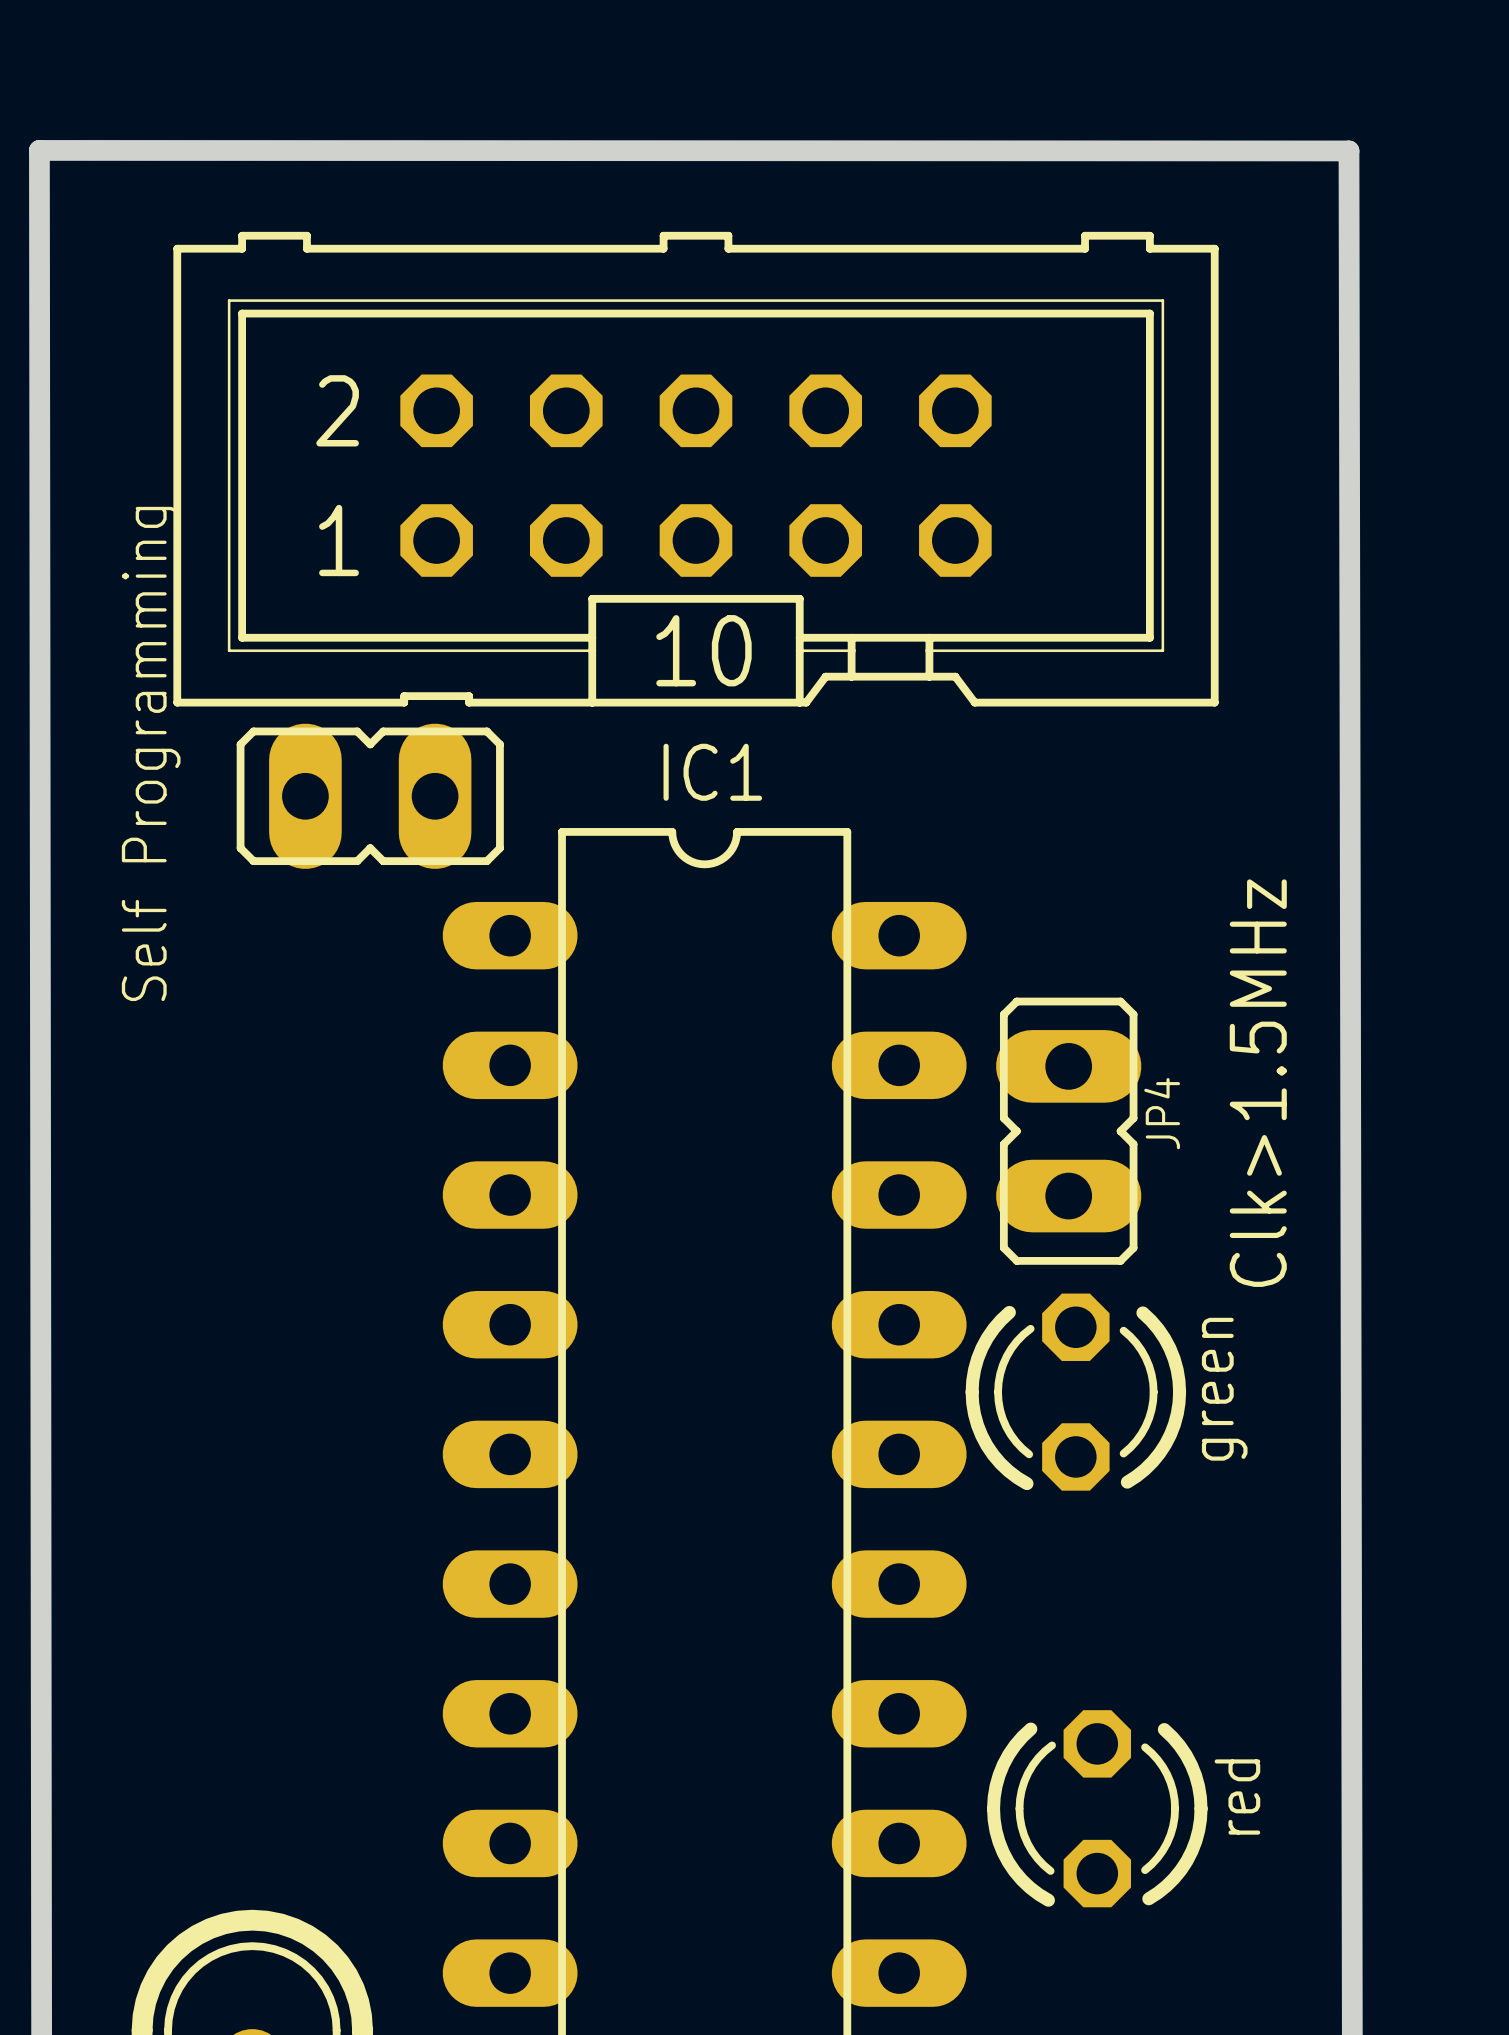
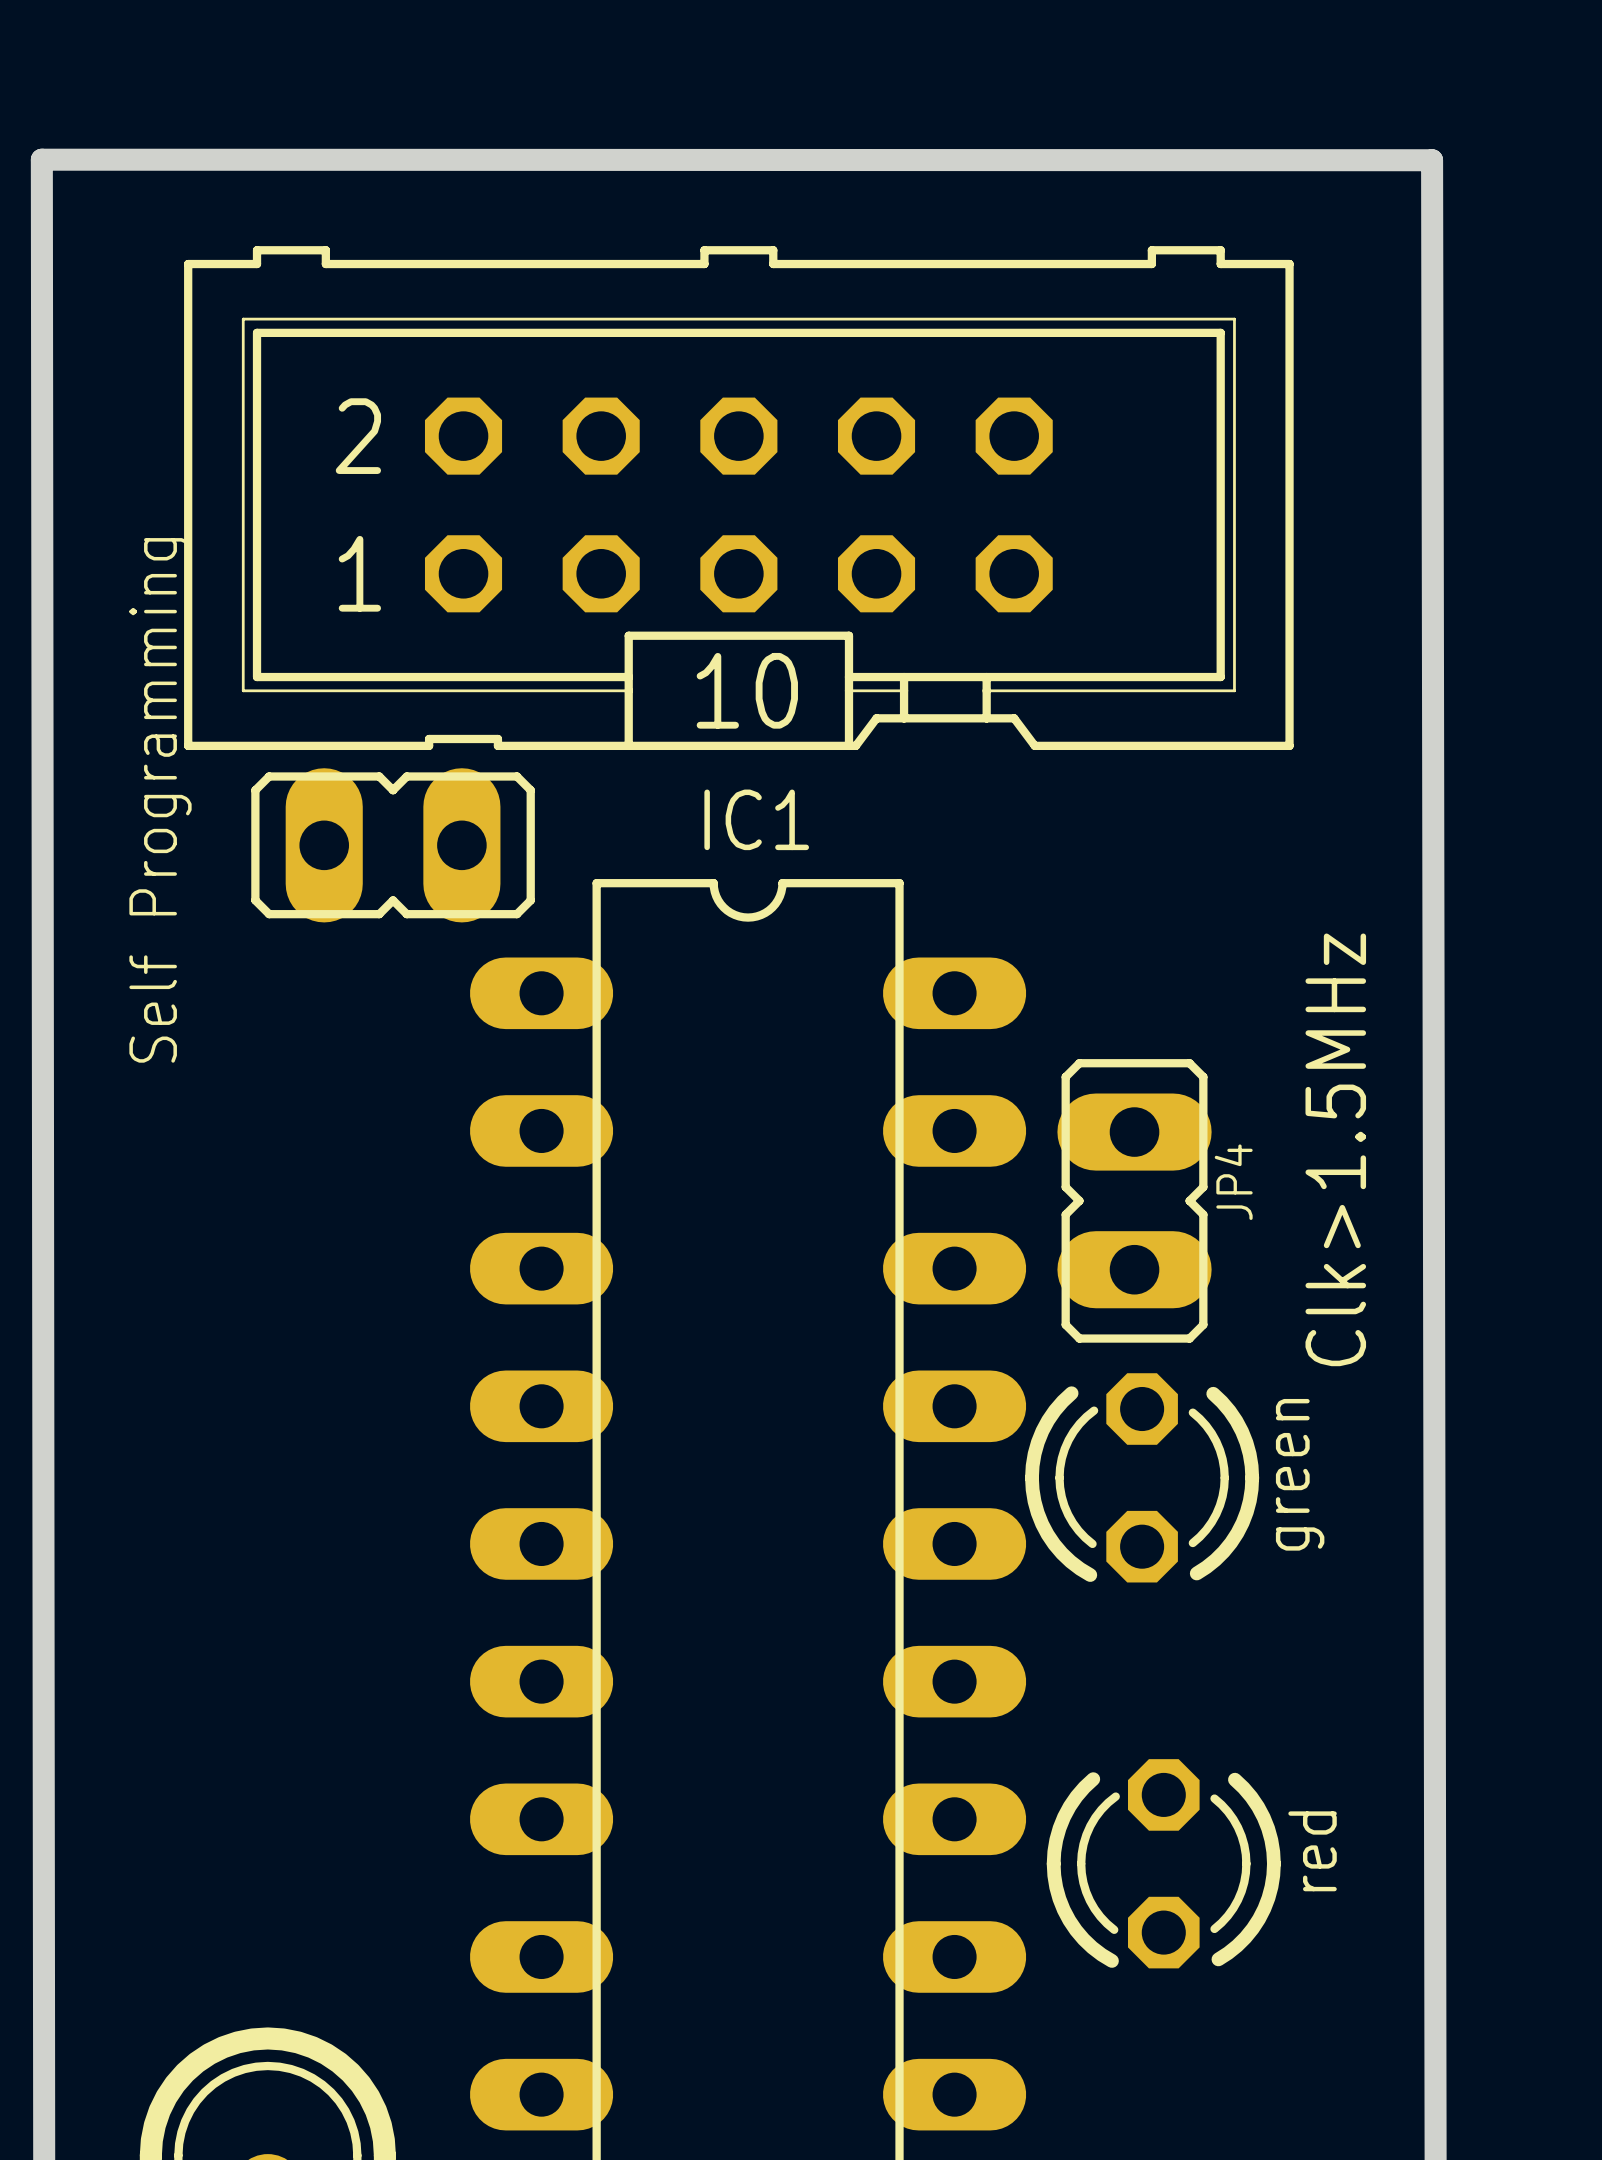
part position: (1097, 1808) -> (1163, 1863)

